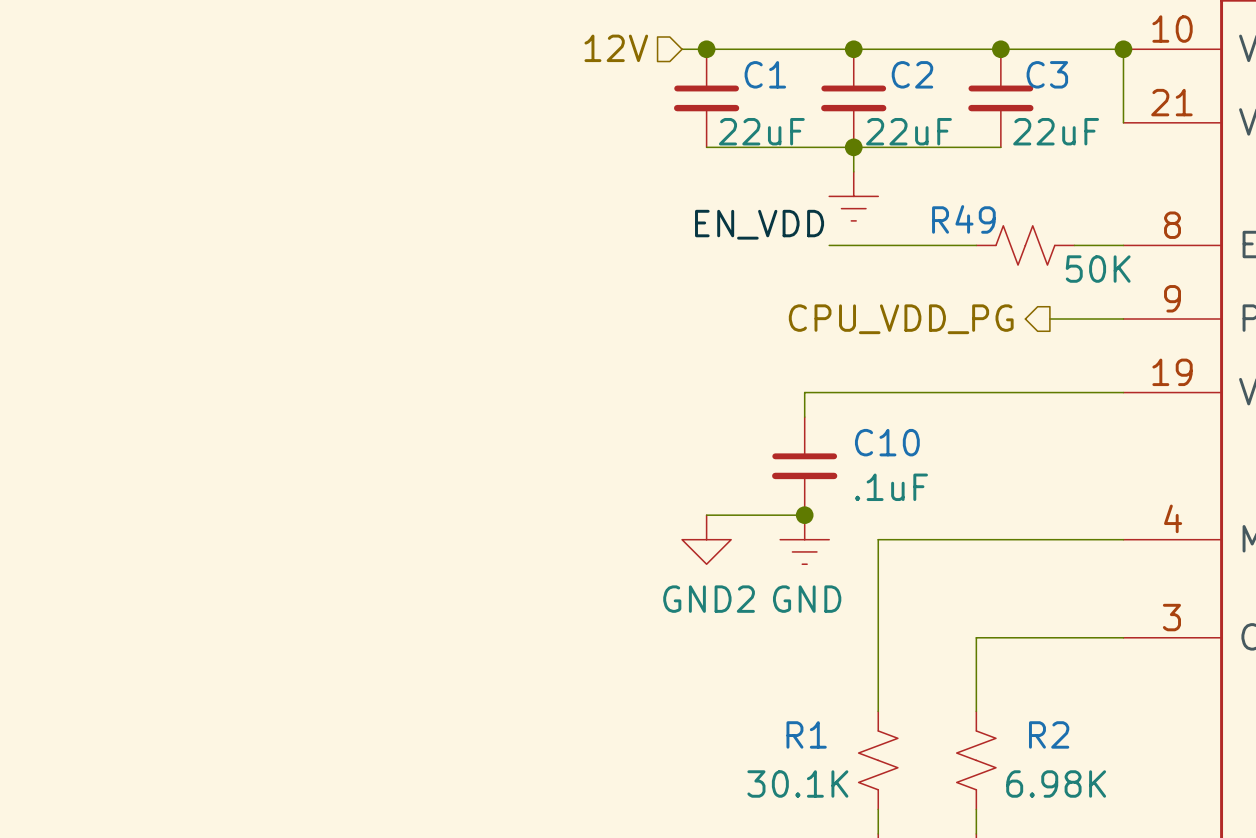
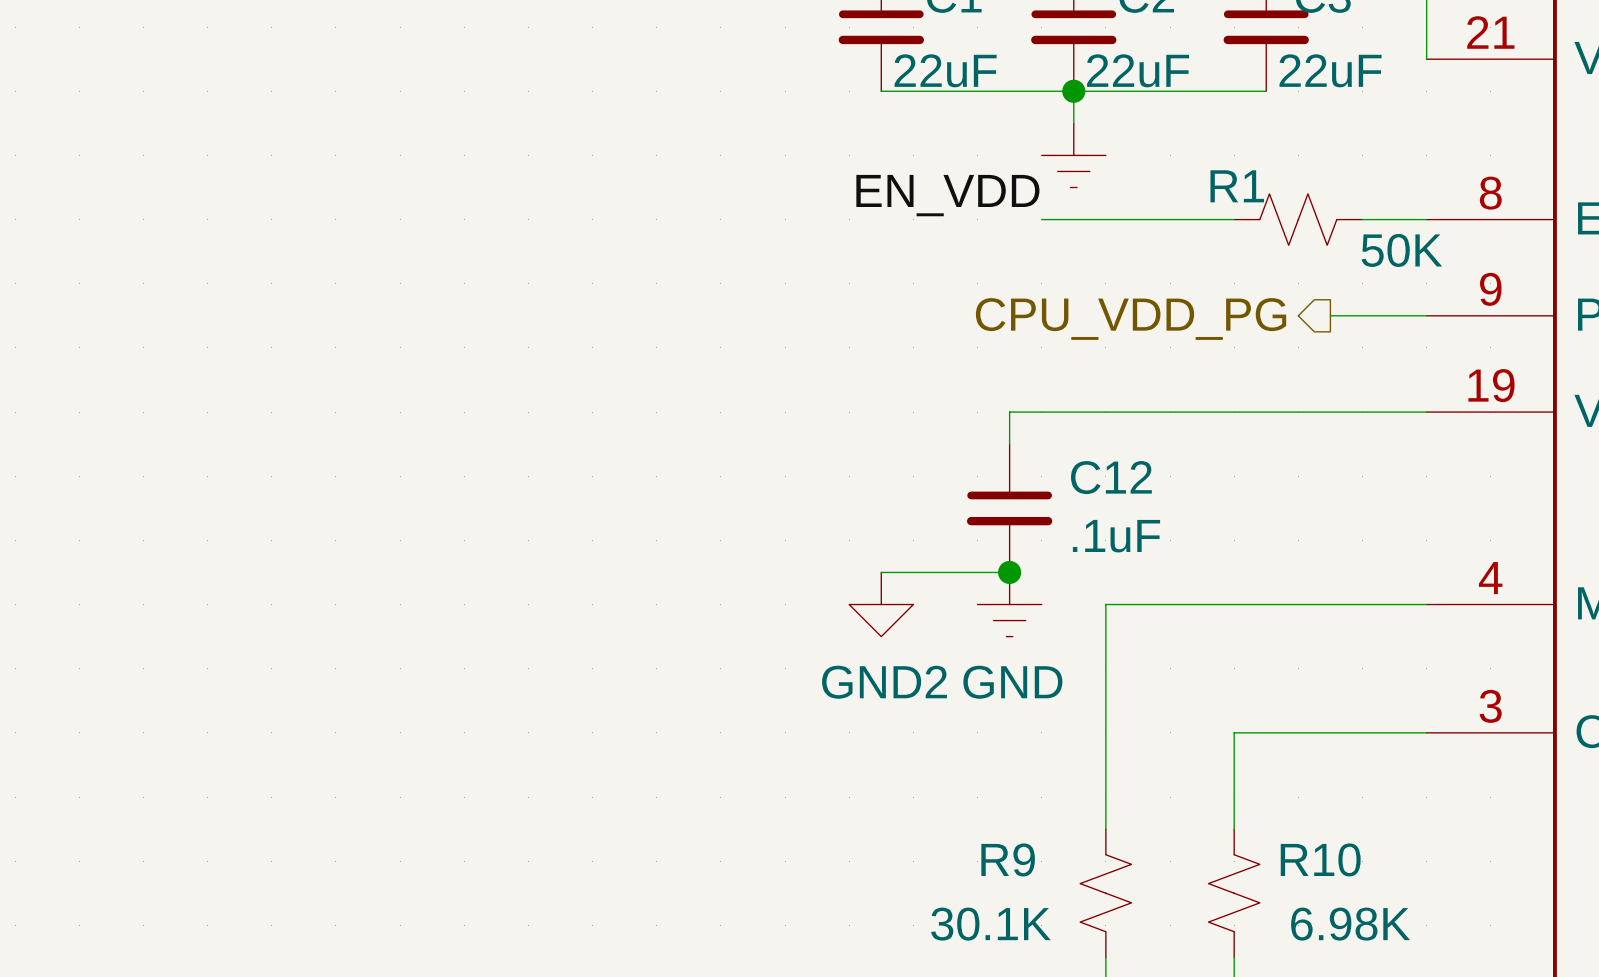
R49 name: R49 (963, 219) -> R1 (1237, 186)
C10 name: C10 (887, 442) -> C12 (1111, 477)
R1 name: R1 (806, 734) -> R9 (1008, 859)
R2 name: R2 (1049, 734) -> R10 (1320, 859)

